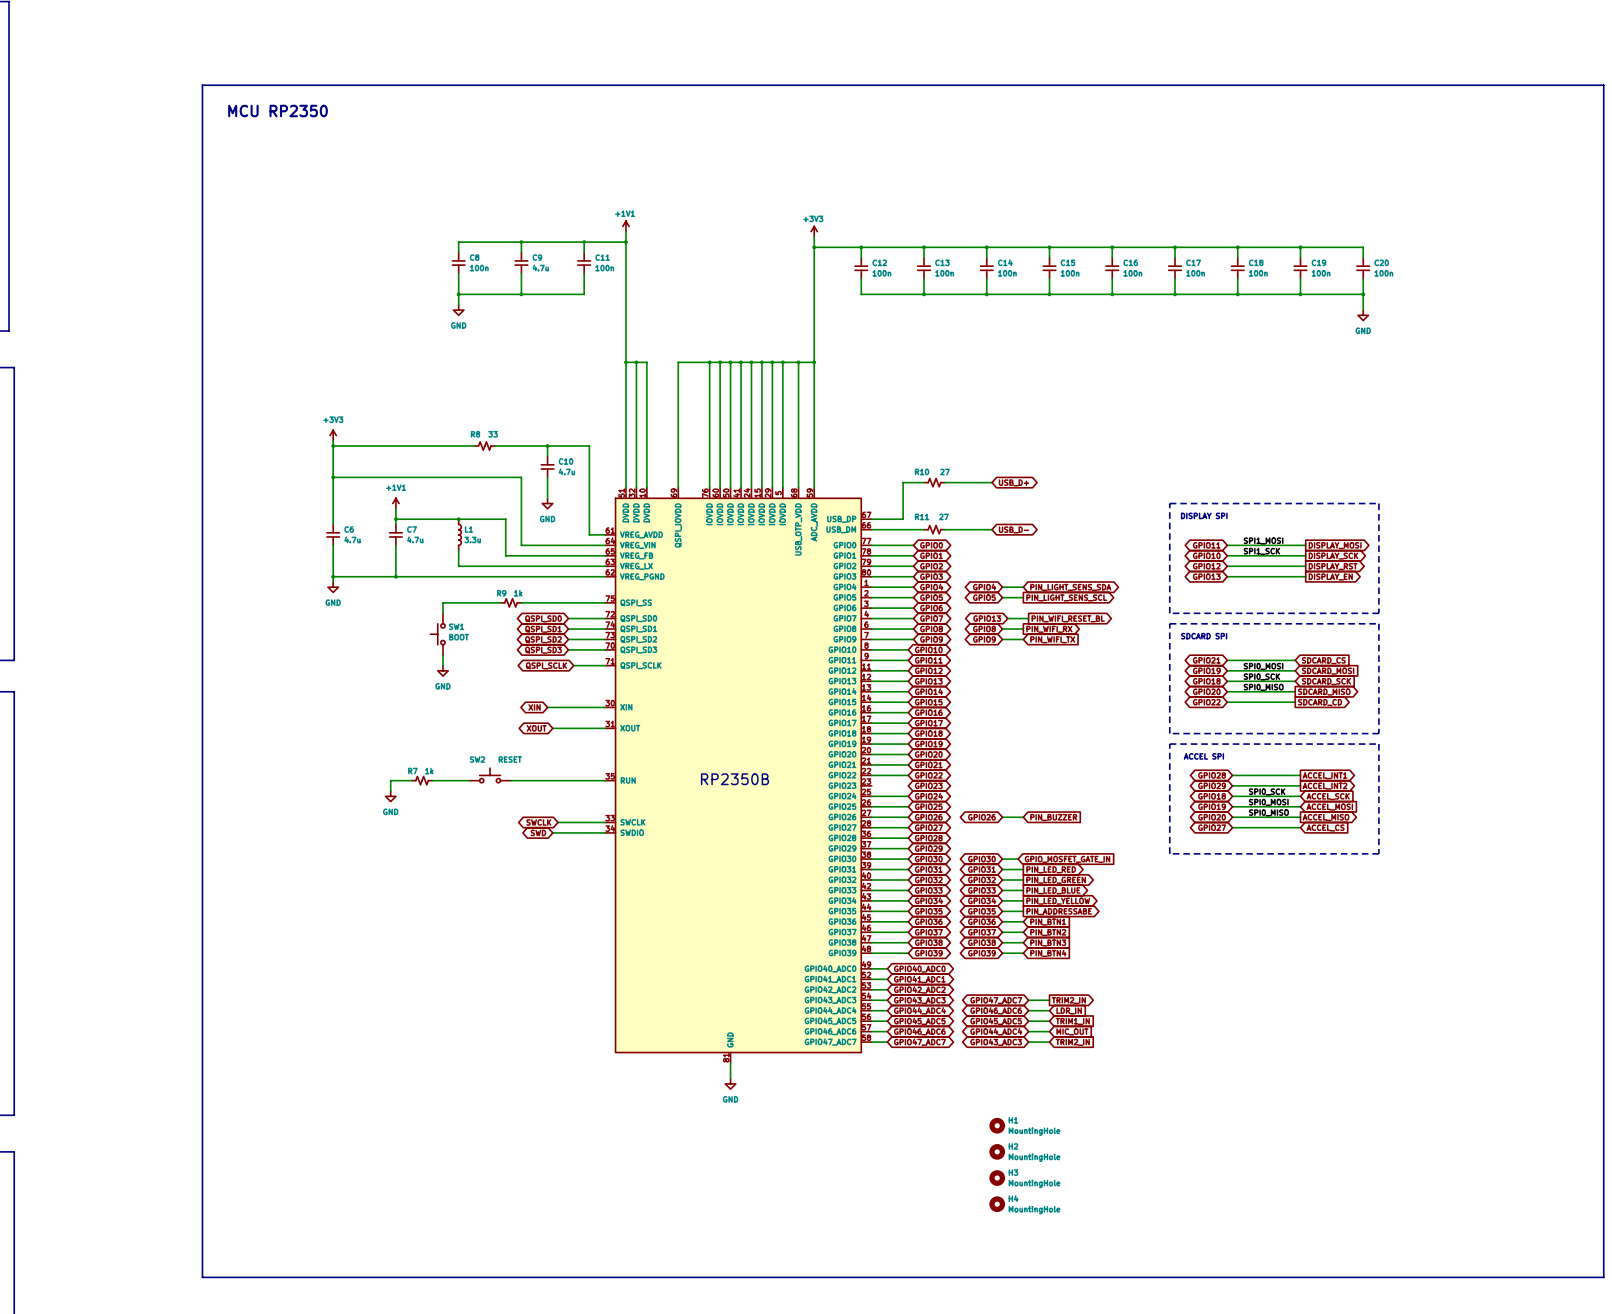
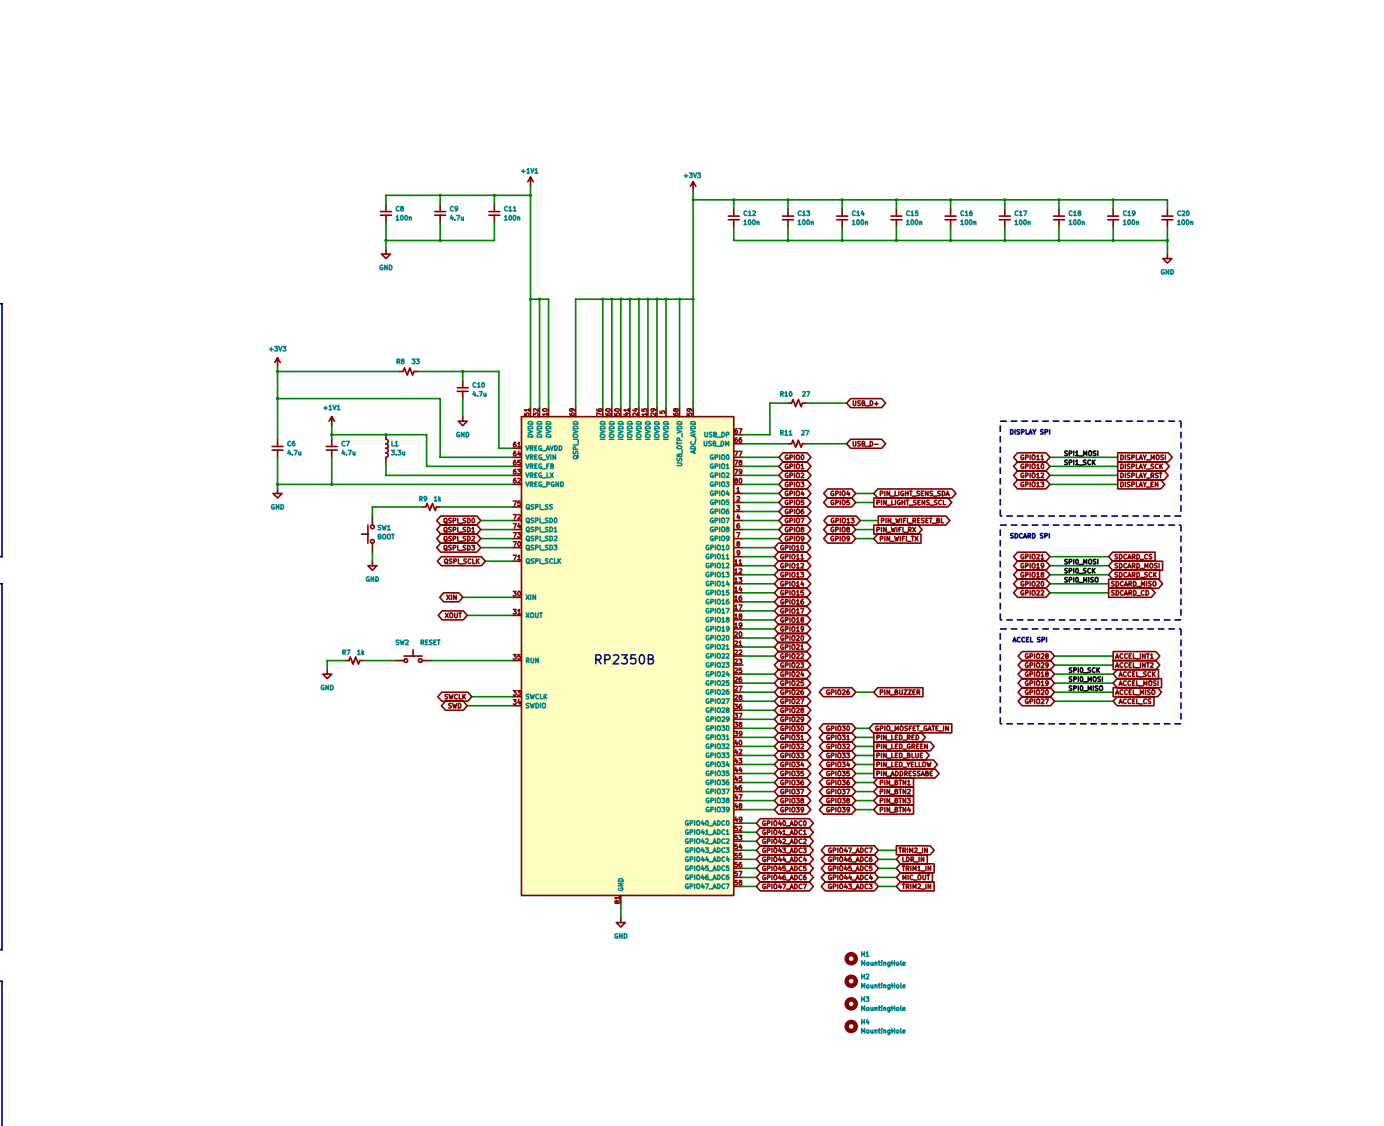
line: (202, 85) (1603, 85) (1603, 1277) (202, 1277) (202, 85) -> none
text: MCU RP2350 (278, 111) -> none

